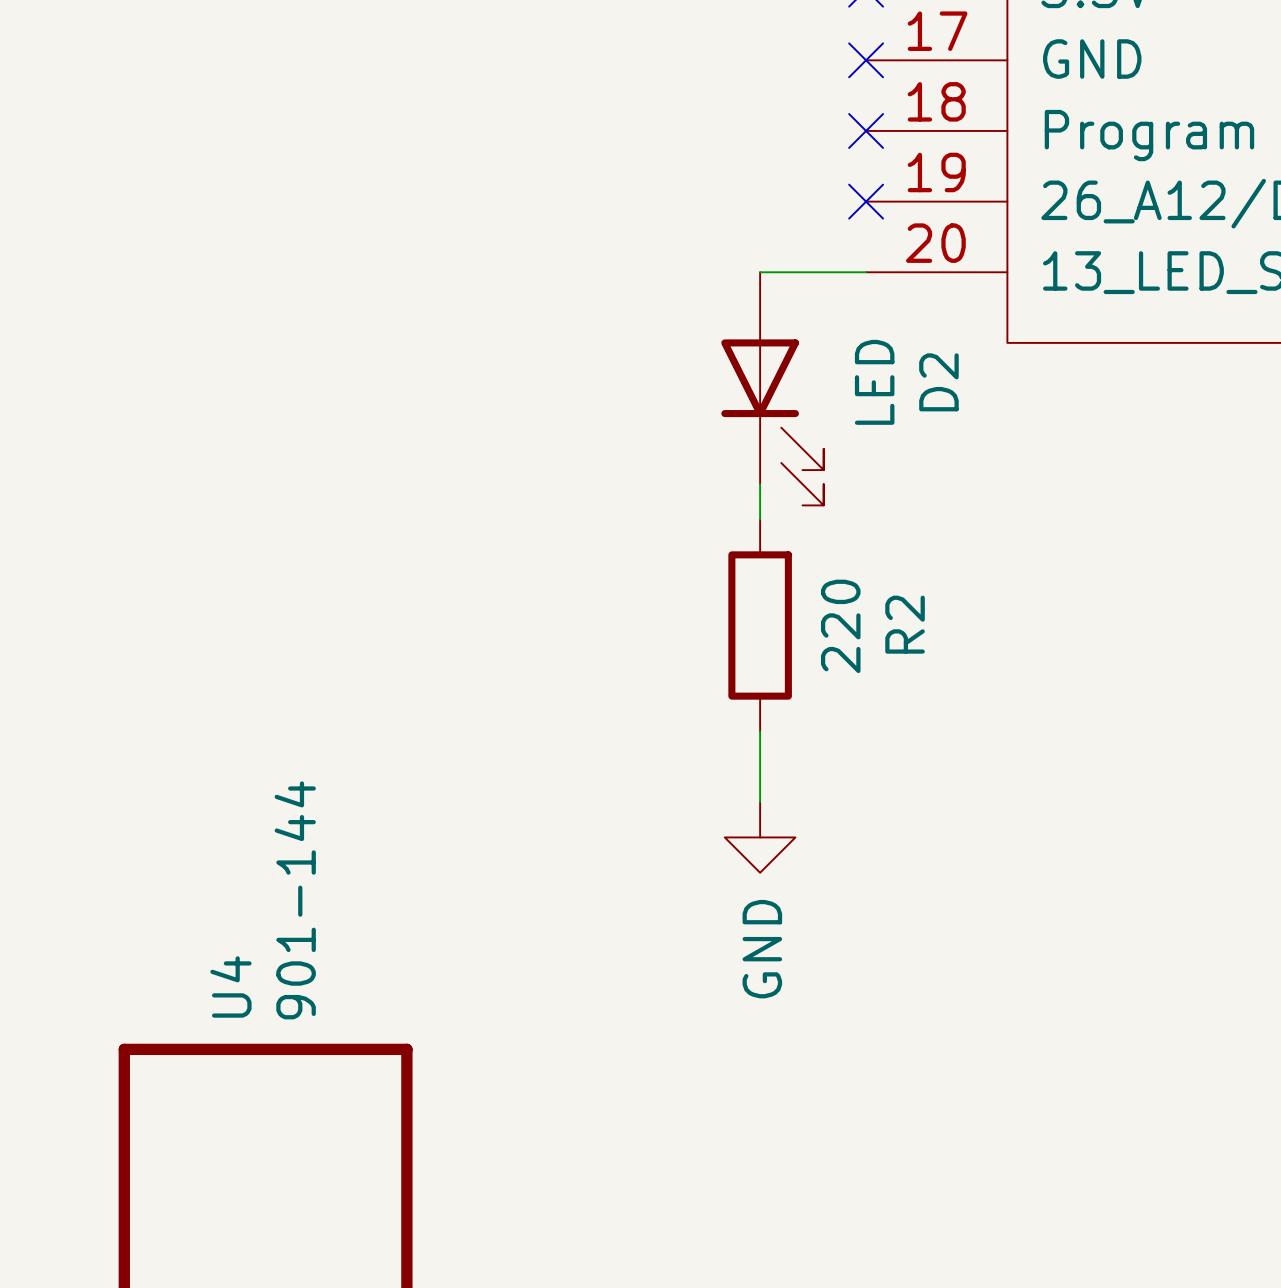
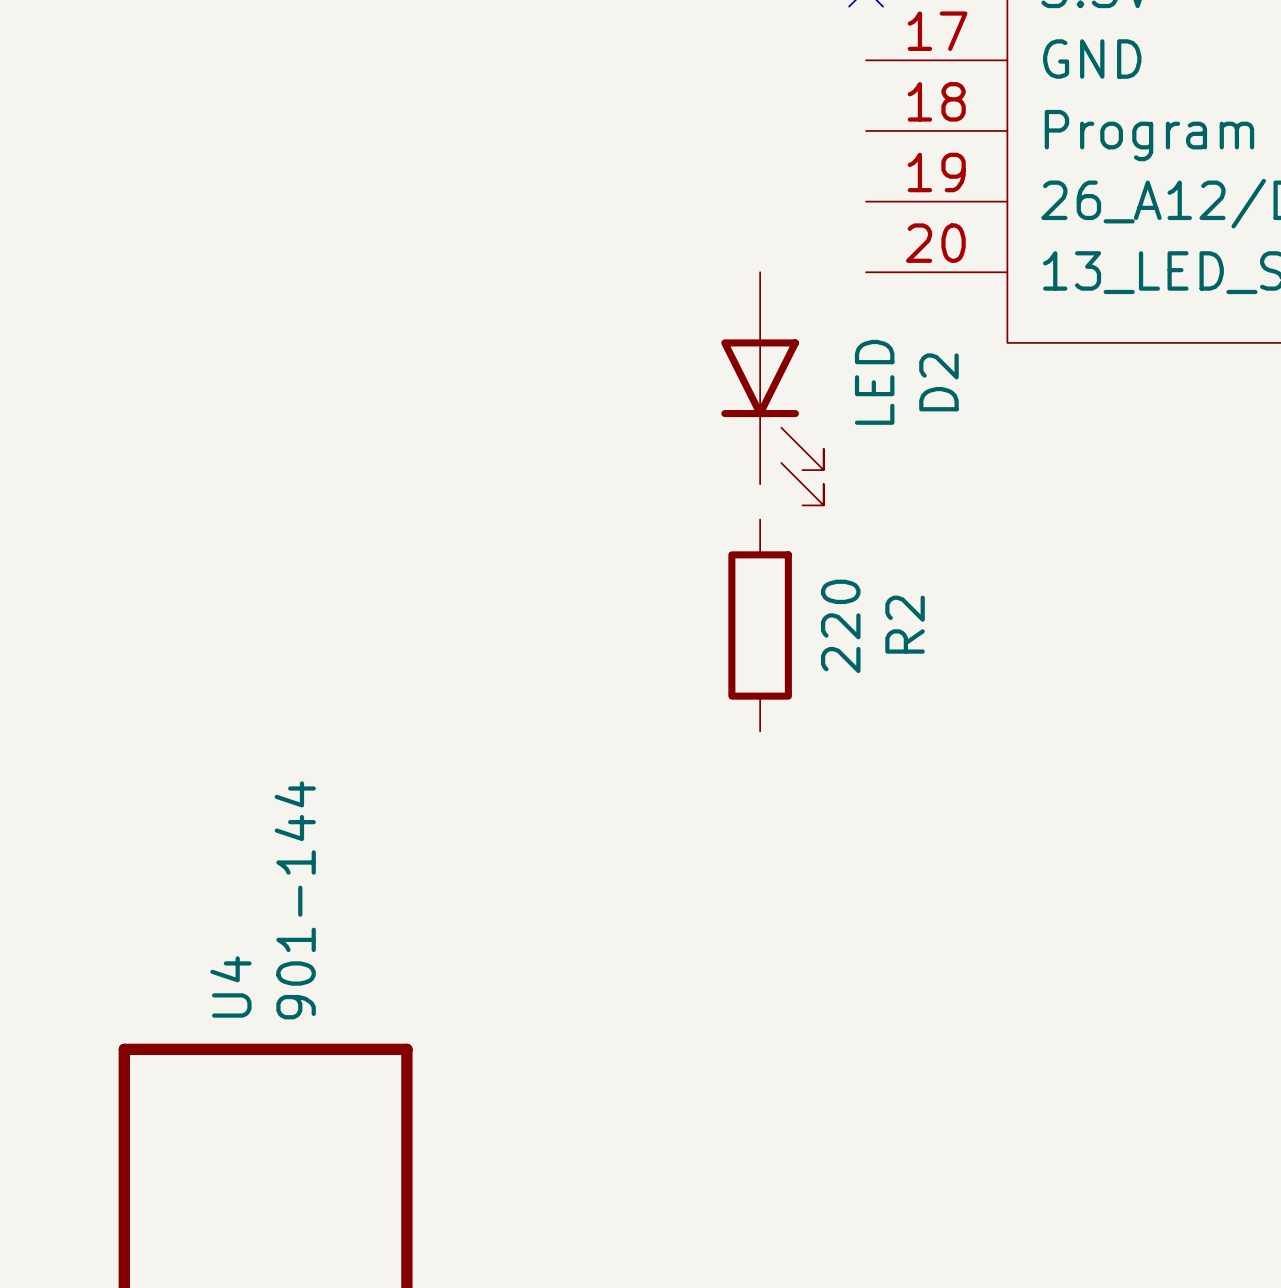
no-connect mark: (866, 60) -> none
no-connect mark: (866, 130) -> none
no-connect mark: (866, 201) -> none
wire: (760, 272) (866, 272) -> none
wire: (760, 484) (760, 519) -> none
wire: (760, 731) (760, 802) -> none
power symbol: GND (760, 837) -> none

